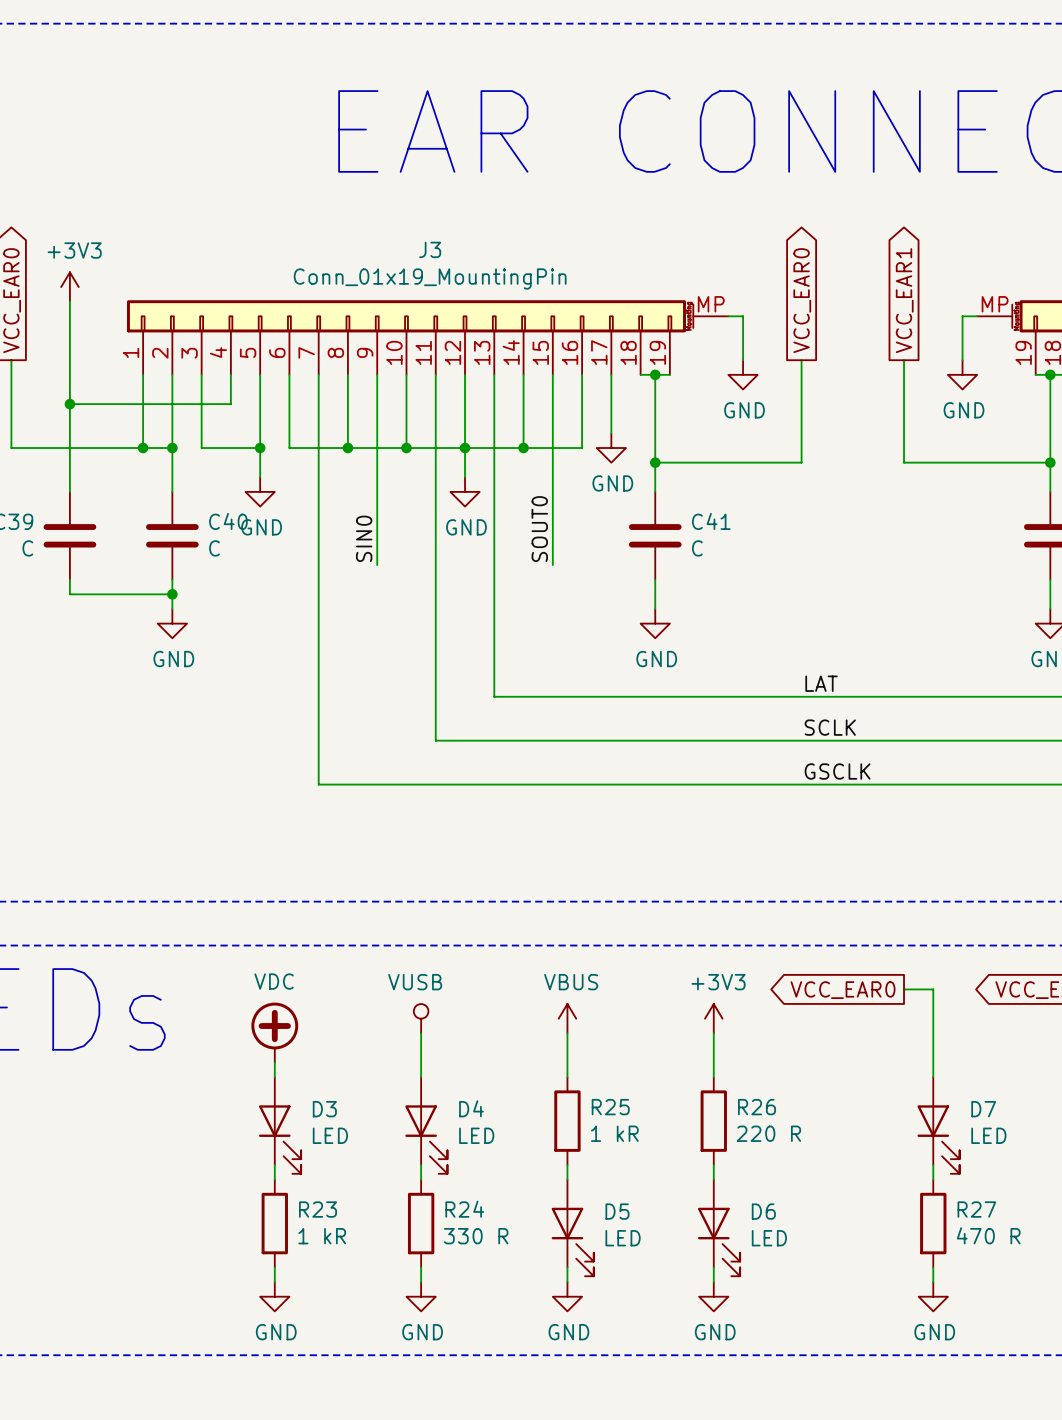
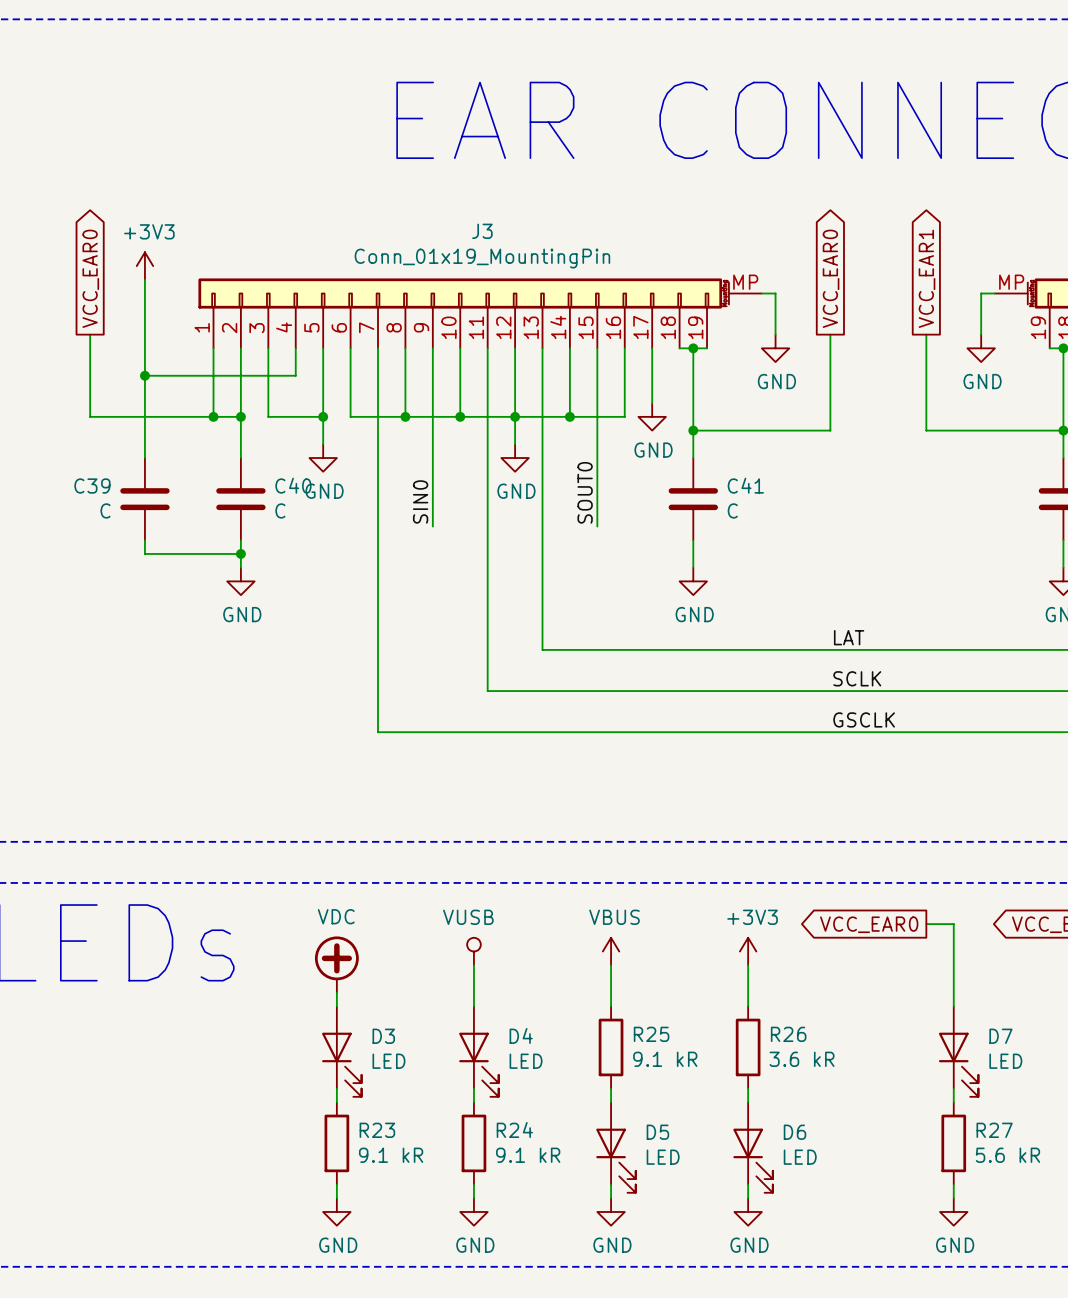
R25 value: 1 kR (614, 1133) -> 9.1 kR (665, 1059)
R26 value: 220 R (768, 1133) -> 3.6 kR (802, 1059)
R27 value: 470 R (988, 1235) -> 5.6 kR (1007, 1155)
R23 value: 1 kR (322, 1236) -> 9.1 kR (391, 1155)
R24 value: 330 R (476, 1236) -> 9.1 kR (528, 1155)

